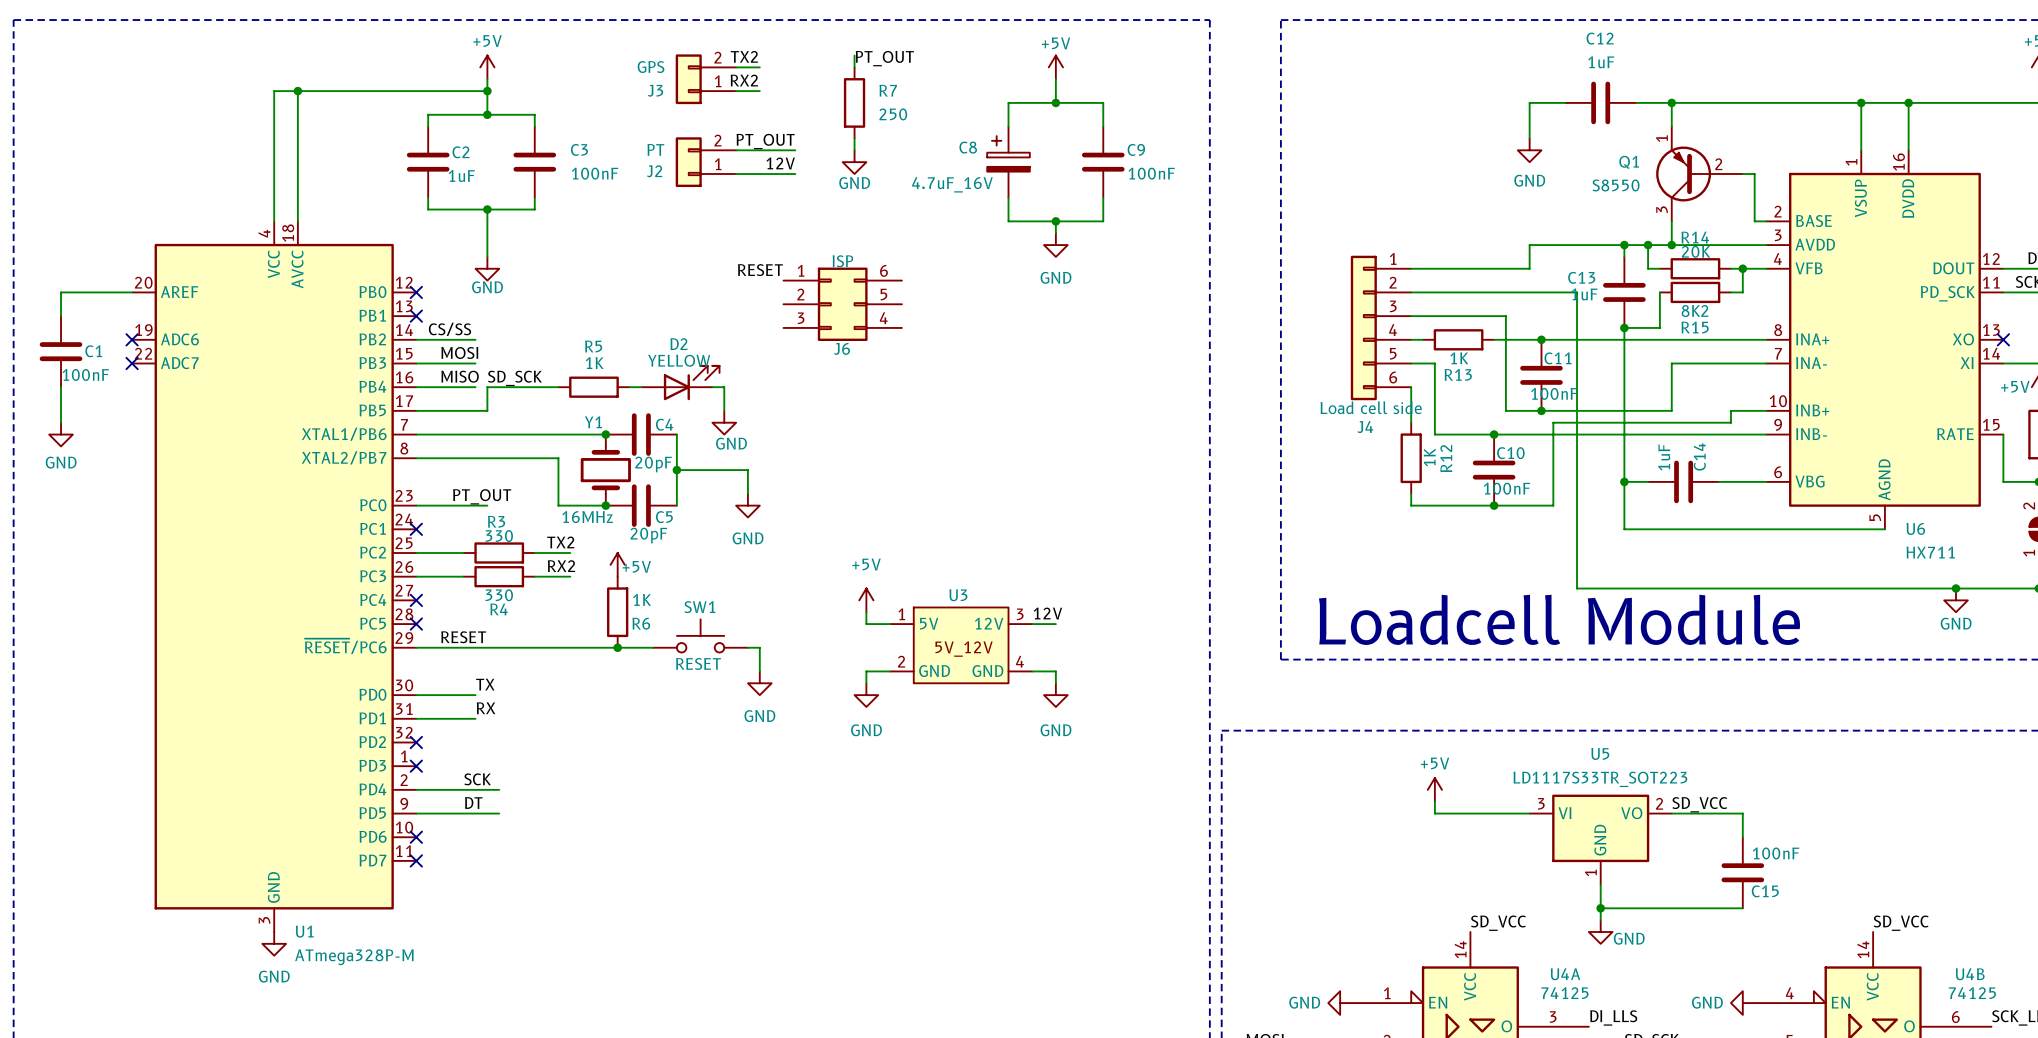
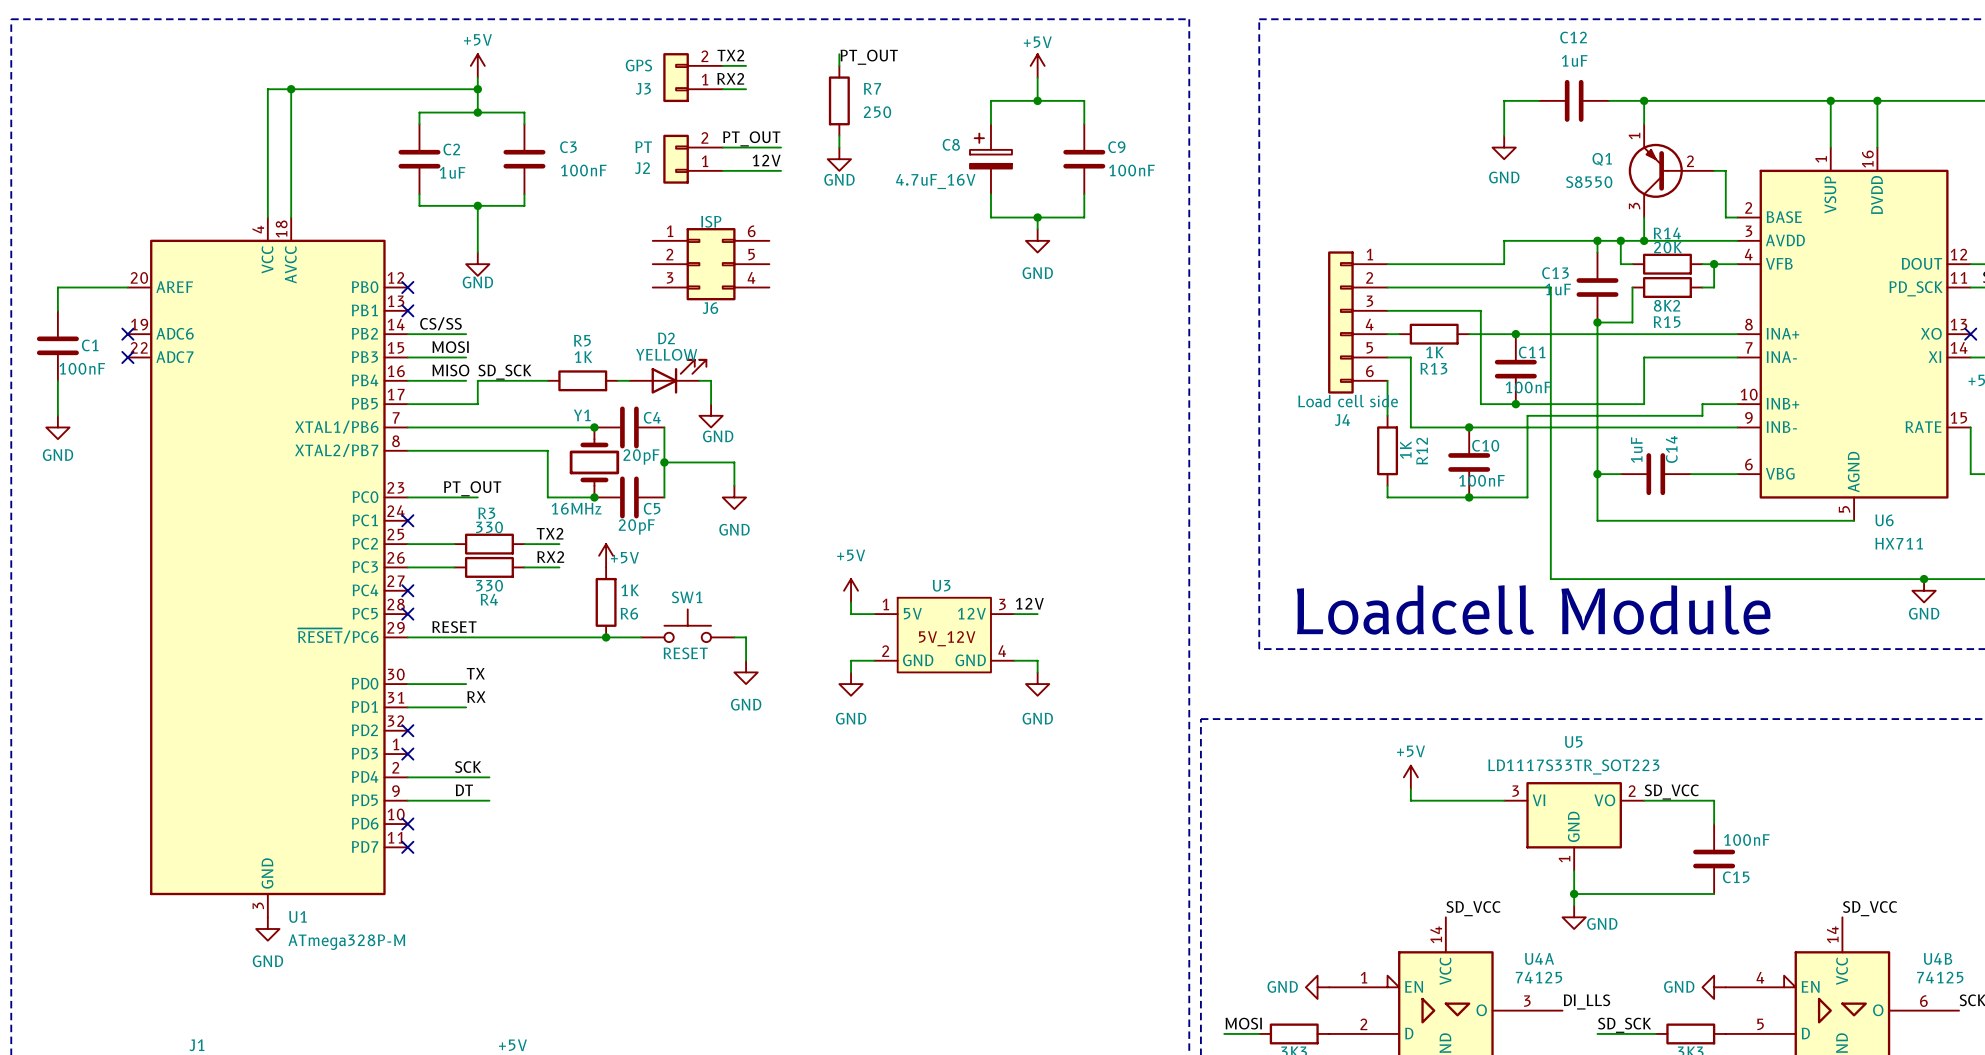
label: RESET (760, 270) -> none
J6 position: (842, 304) -> (711, 264)

